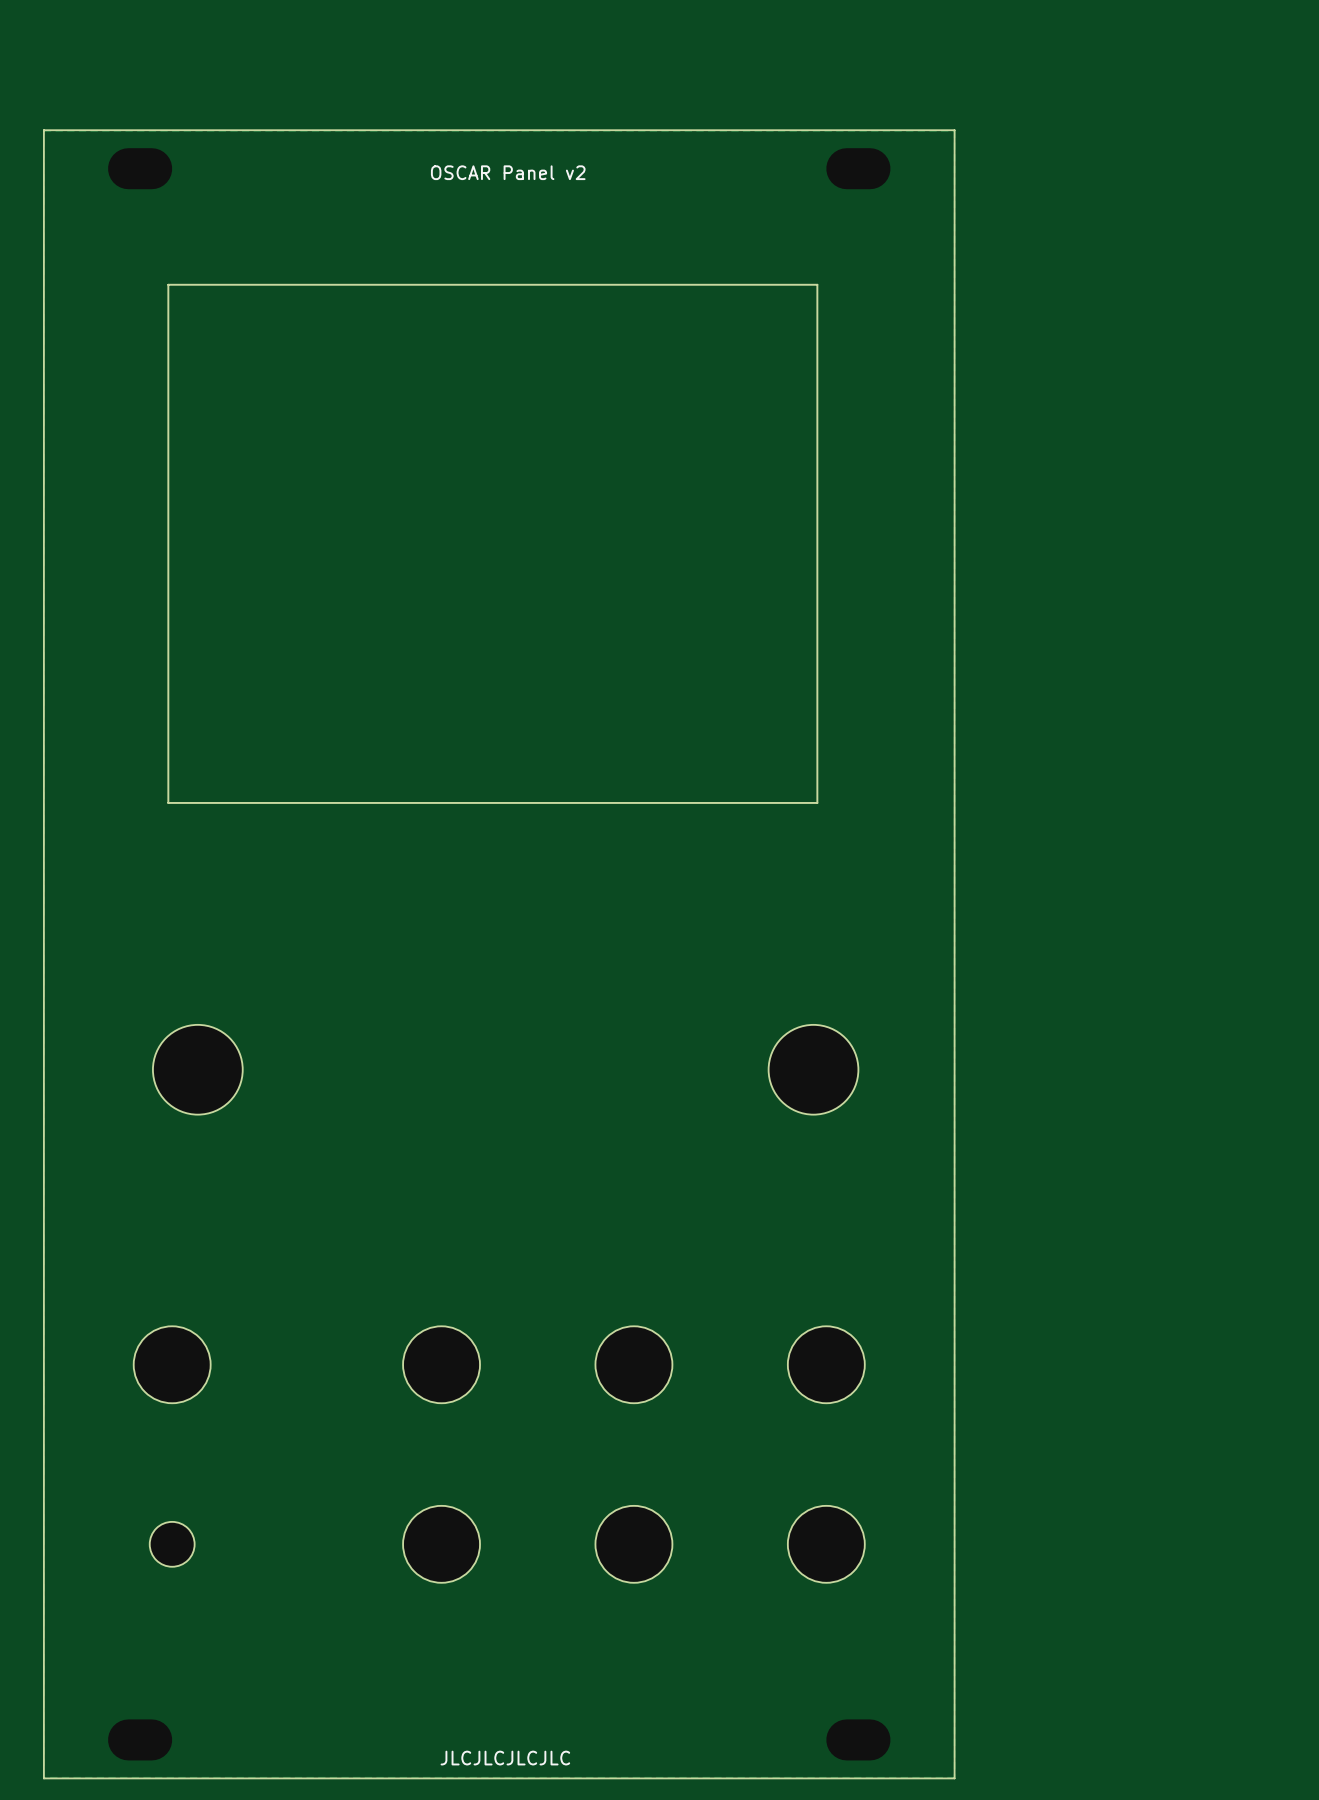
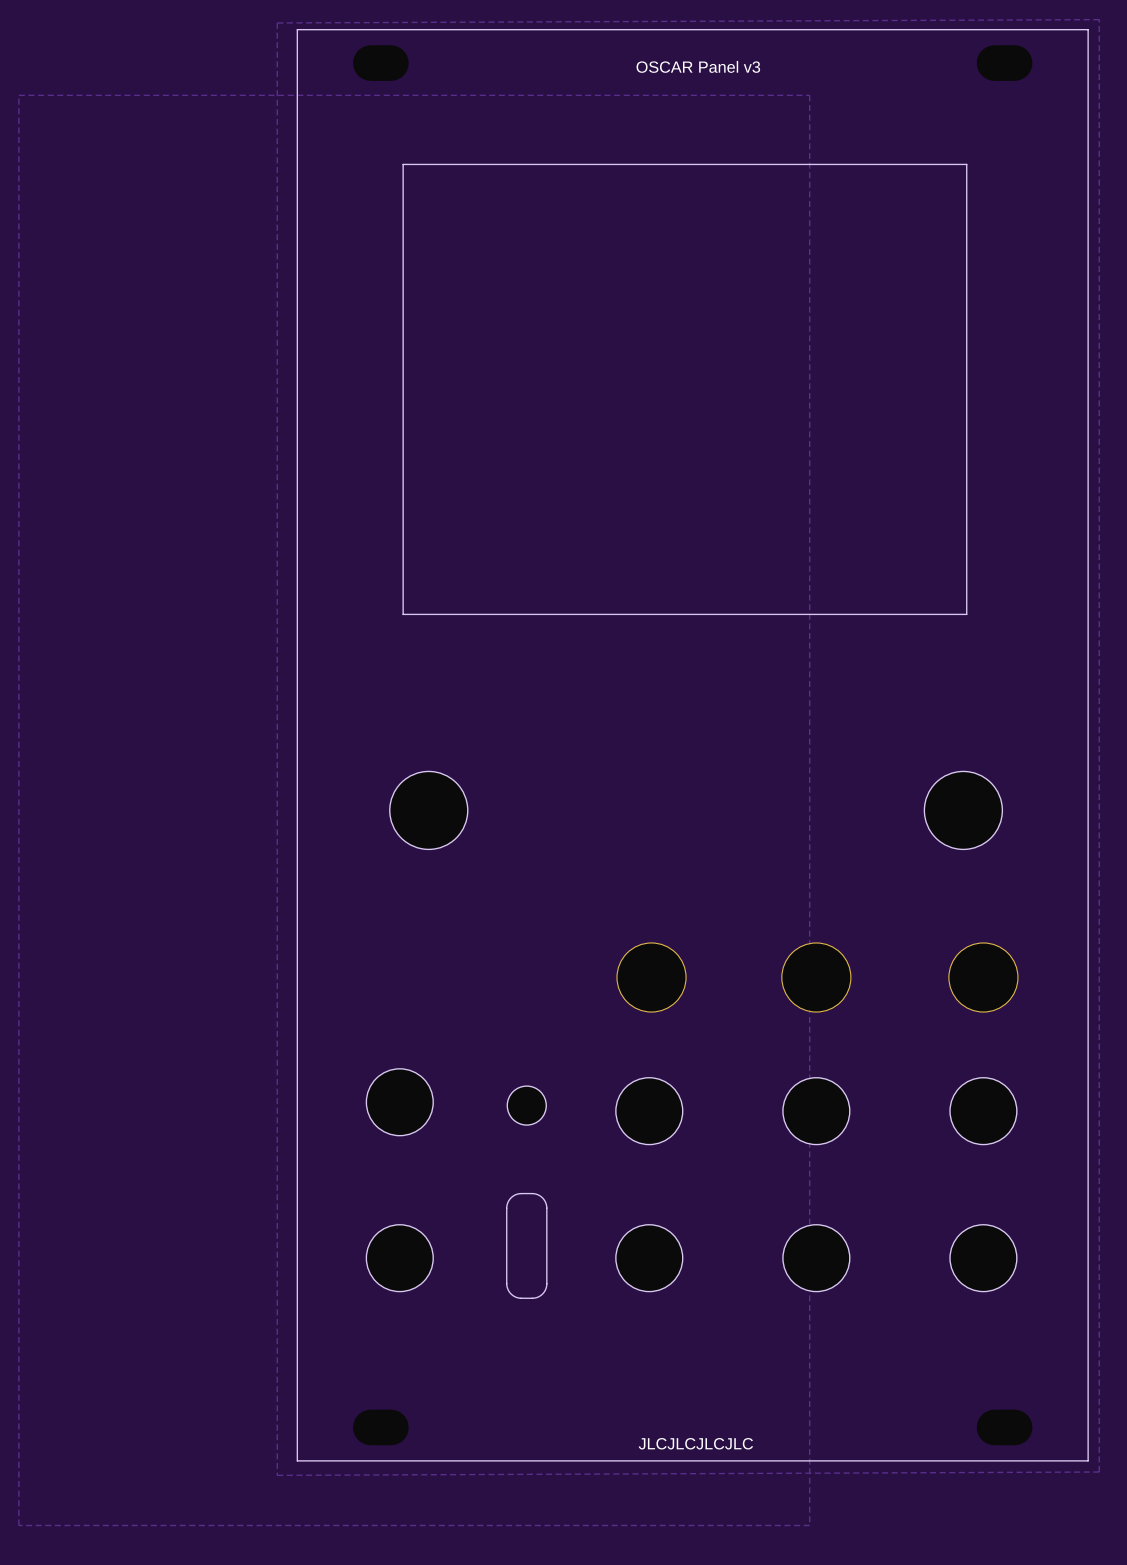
zone outline: none -> (1099, 19) (277, 22) (277, 1475) (1099, 1472) (1099, 19)
board edge: none -> (1088, 29) (297, 29) (297, 1460) (1088, 1460) (1088, 29)
part: none -> (380, 63)
part: none -> (1004, 63)
text: none -> OSCAR Panel v3 (698, 66)
board edge: (954, 130) (43, 130) (43, 1778) (954, 1778) (954, 130) -> none
part: (140, 168) -> none
part: (858, 168) -> none
text: OSCAR Panel v2 (508, 172) -> none
board edge: none -> (966, 164) (403, 164) (403, 614) (966, 614) (966, 164)
board edge: (817, 284) (817, 802) (168, 802) (168, 284) (817, 284) -> none
part: none -> (428, 810)
part: none -> (963, 810)
part: (197, 1069) -> none
part: (813, 1069) -> none
part: none -> (651, 977)
part: none -> (816, 977)
part: none -> (983, 977)
part: none -> (399, 1102)
part: none -> (526, 1105)
part: none -> (649, 1111)
part: none -> (816, 1111)
part: none -> (983, 1111)
part: (172, 1364) -> none
part: (441, 1364) -> none
part: (633, 1364) -> none
part: (826, 1364) -> none
drawing: none -> [506, 1192, 548, 1299]
part: none -> (399, 1258)
part: none -> (649, 1258)
part: none -> (816, 1258)
part: none -> (983, 1258)
part: (172, 1544) -> none
part: (441, 1544) -> none
part: (633, 1544) -> none
part: (826, 1544) -> none
part: none -> (380, 1427)
part: none -> (1004, 1427)
text: none -> JLCJLCJLCJLC (695, 1443)
part: (140, 1739) -> none
part: (858, 1739) -> none
text: JLCJLCJLCJLC (505, 1758) -> none

